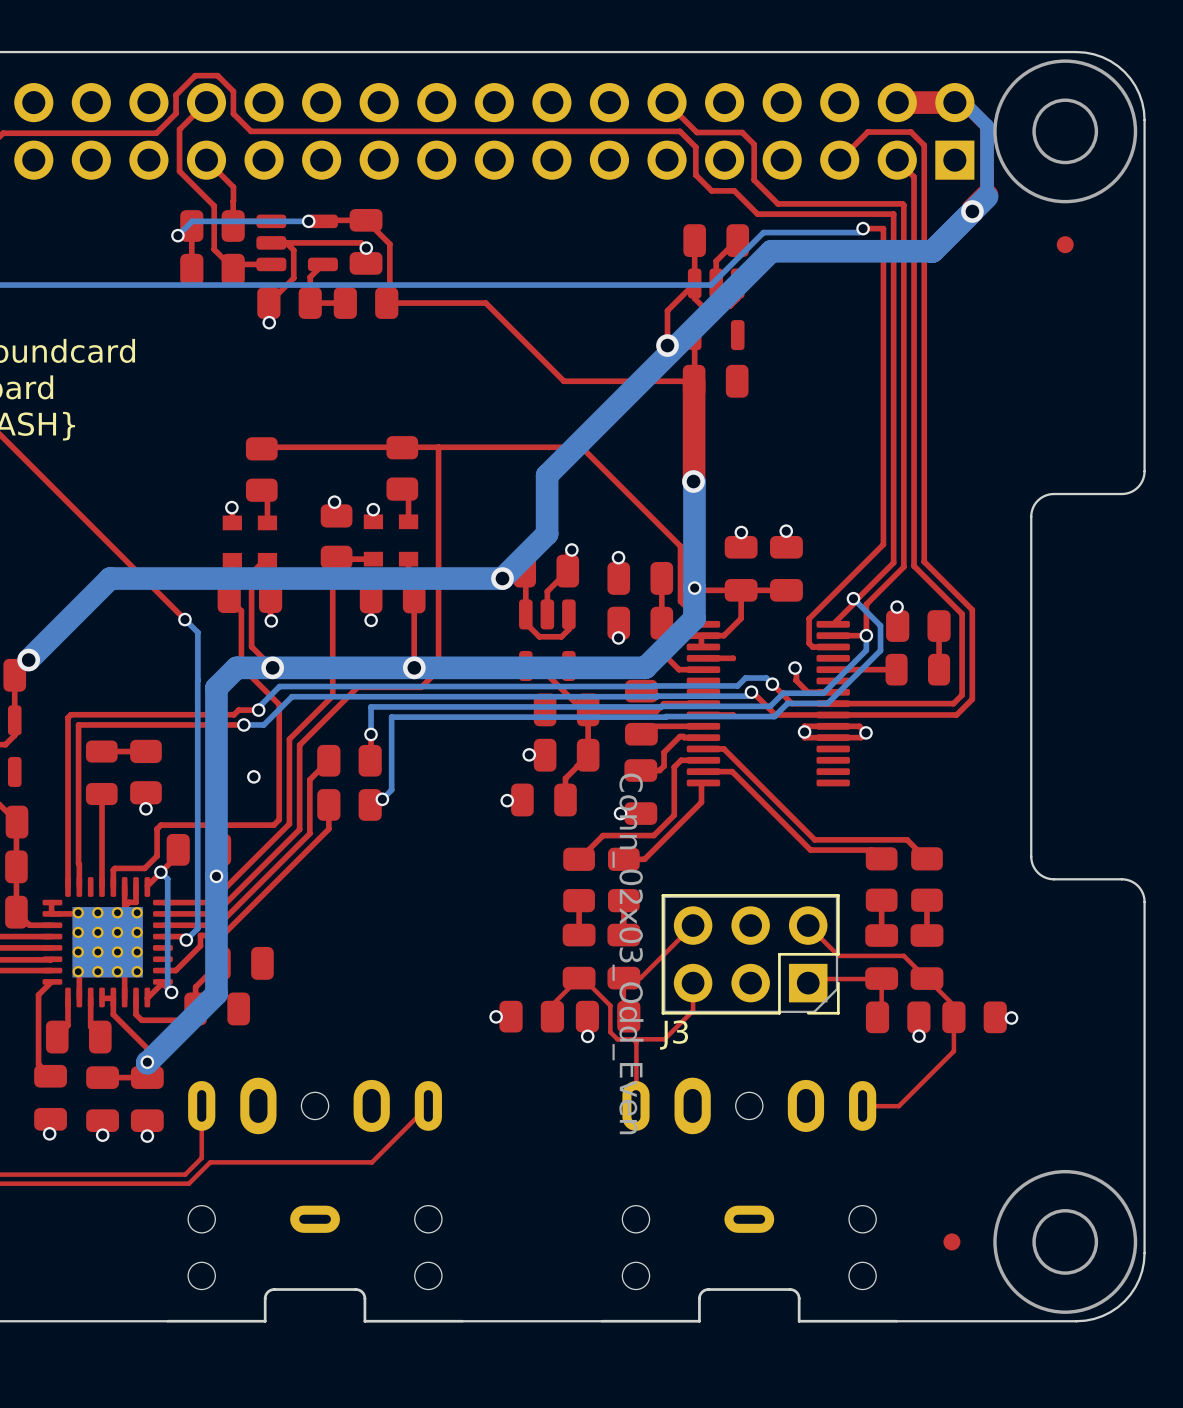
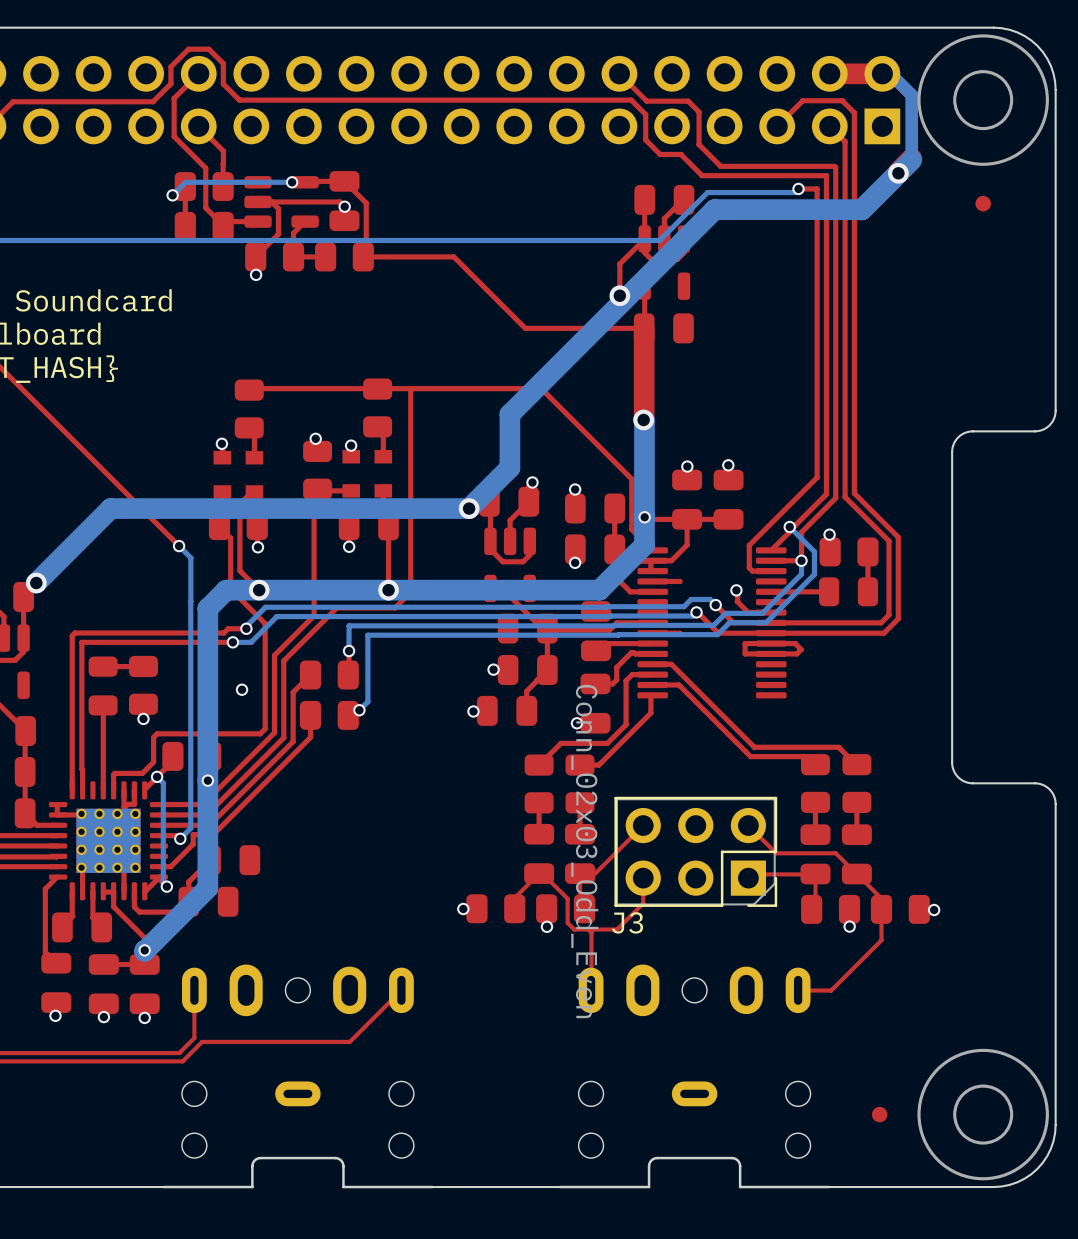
via: (804, 731) -> none
via: (866, 732) -> none

